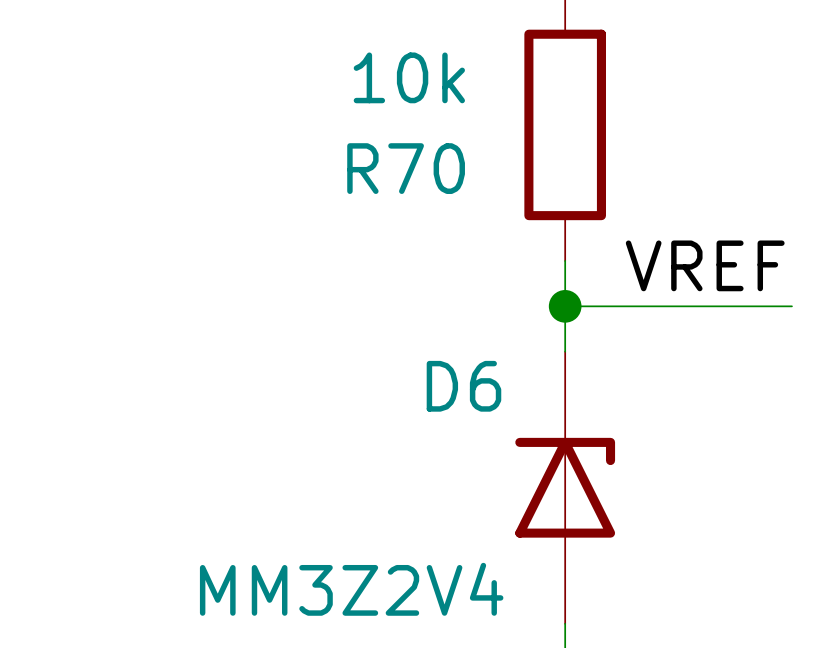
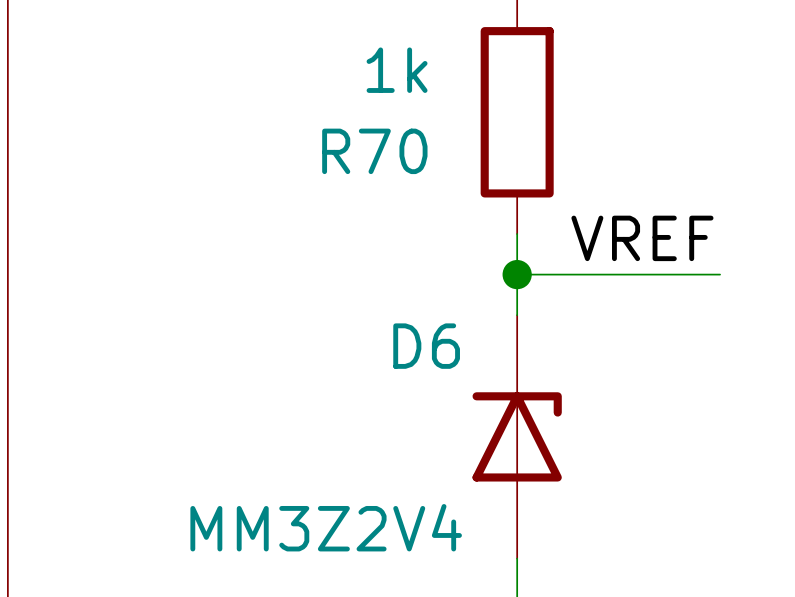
R70 value: 10k (409, 77) -> 1k (397, 70)

